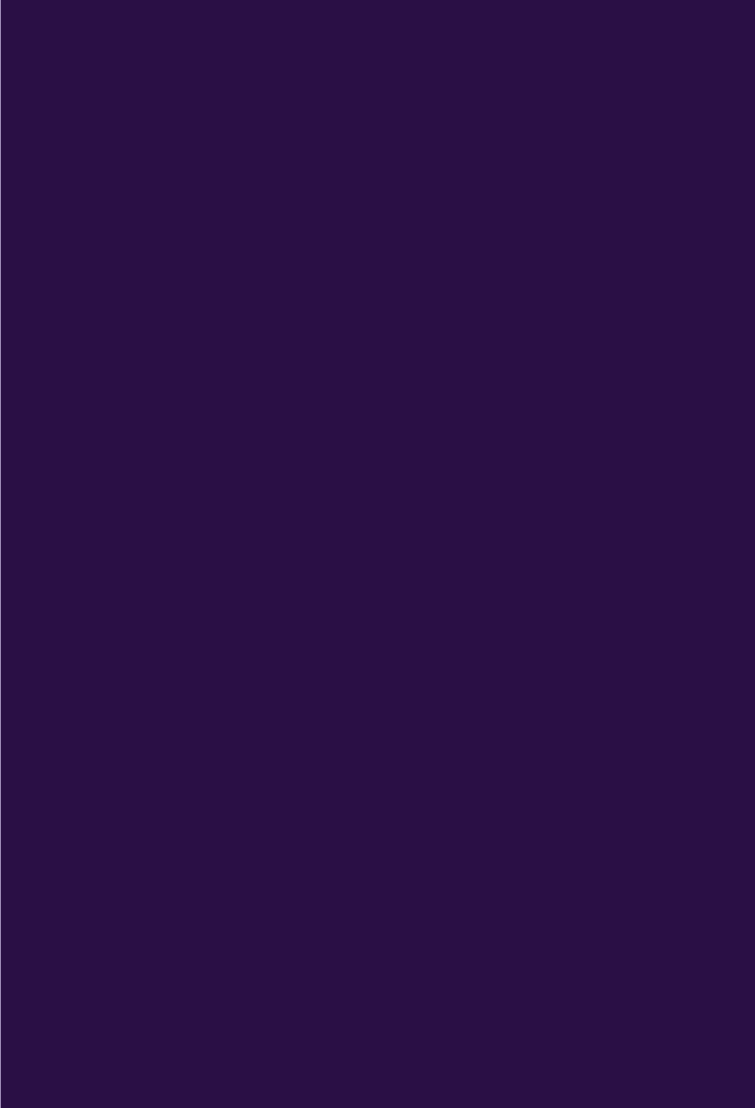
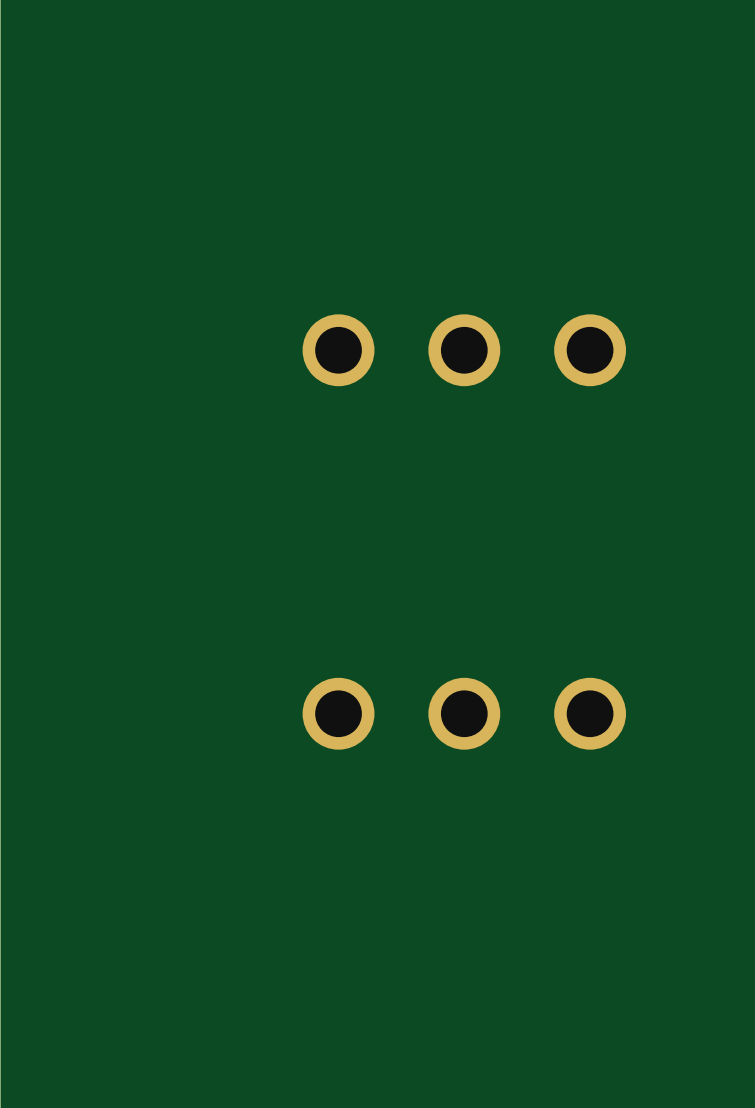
part: none -> (464, 350)
part: none -> (464, 713)

